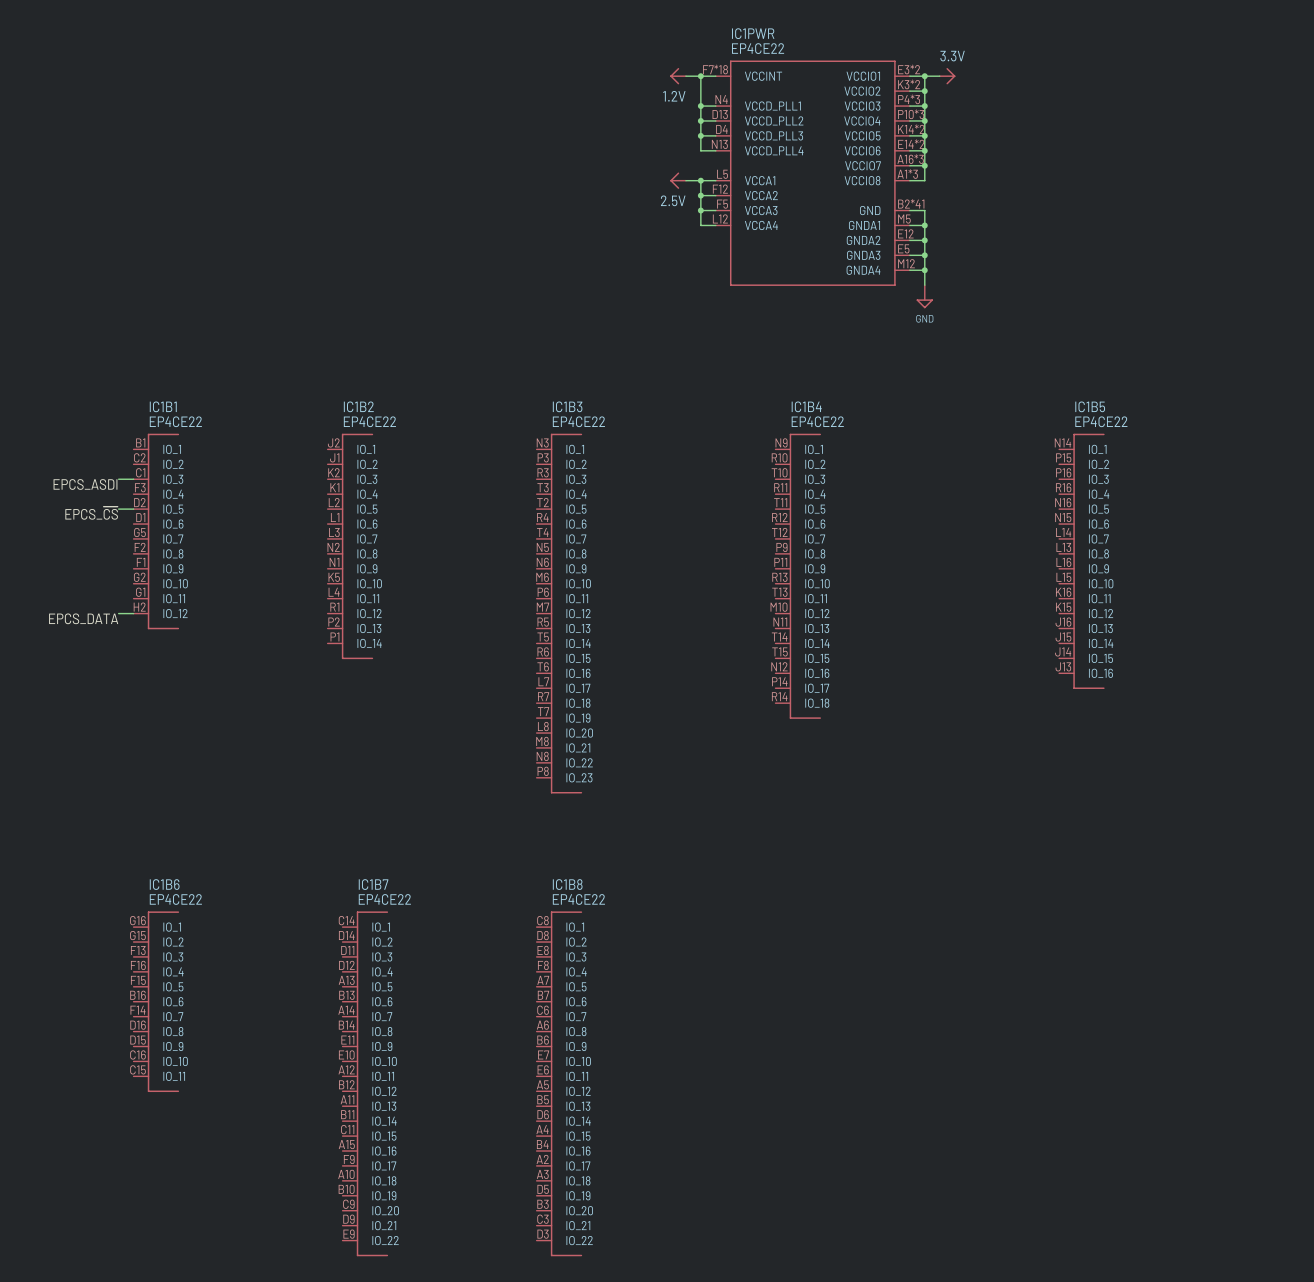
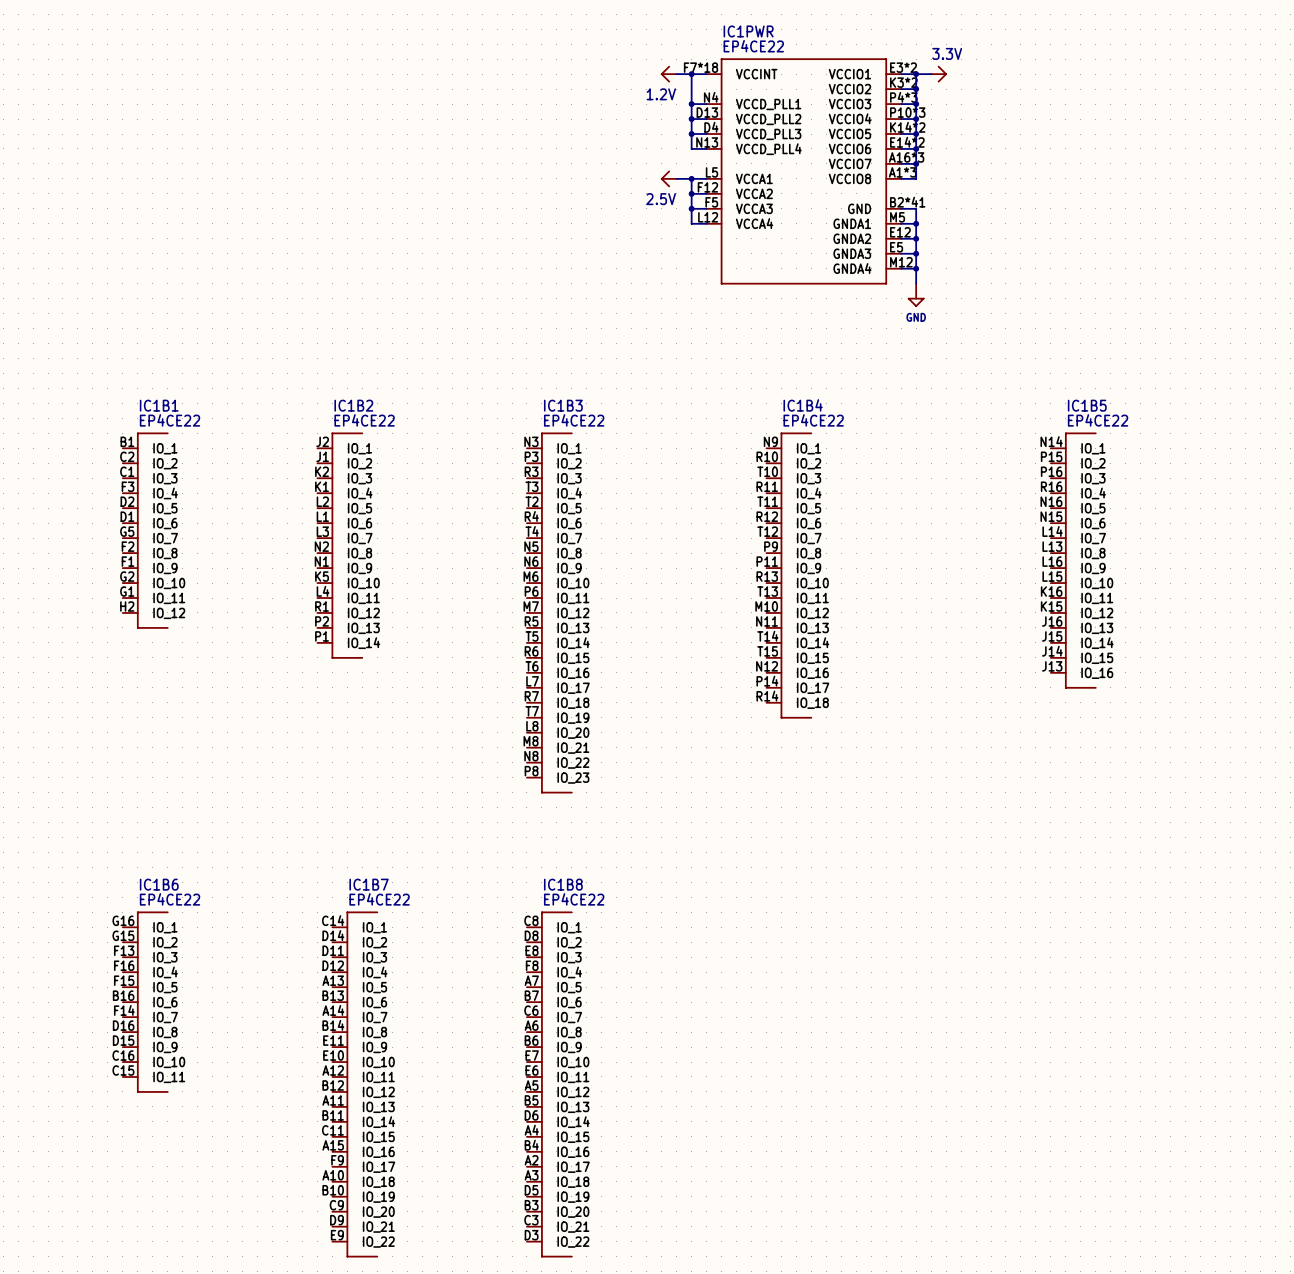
wire: (118, 479) (133, 479) -> none
label: EPCS_ASDI (85, 484) -> none
wire: (118, 509) (133, 509) -> none
label: EPCS_~{CS} (91, 513) -> none
wire: (118, 613) (133, 613) -> none
label: EPCS_DATA (83, 618) -> none

